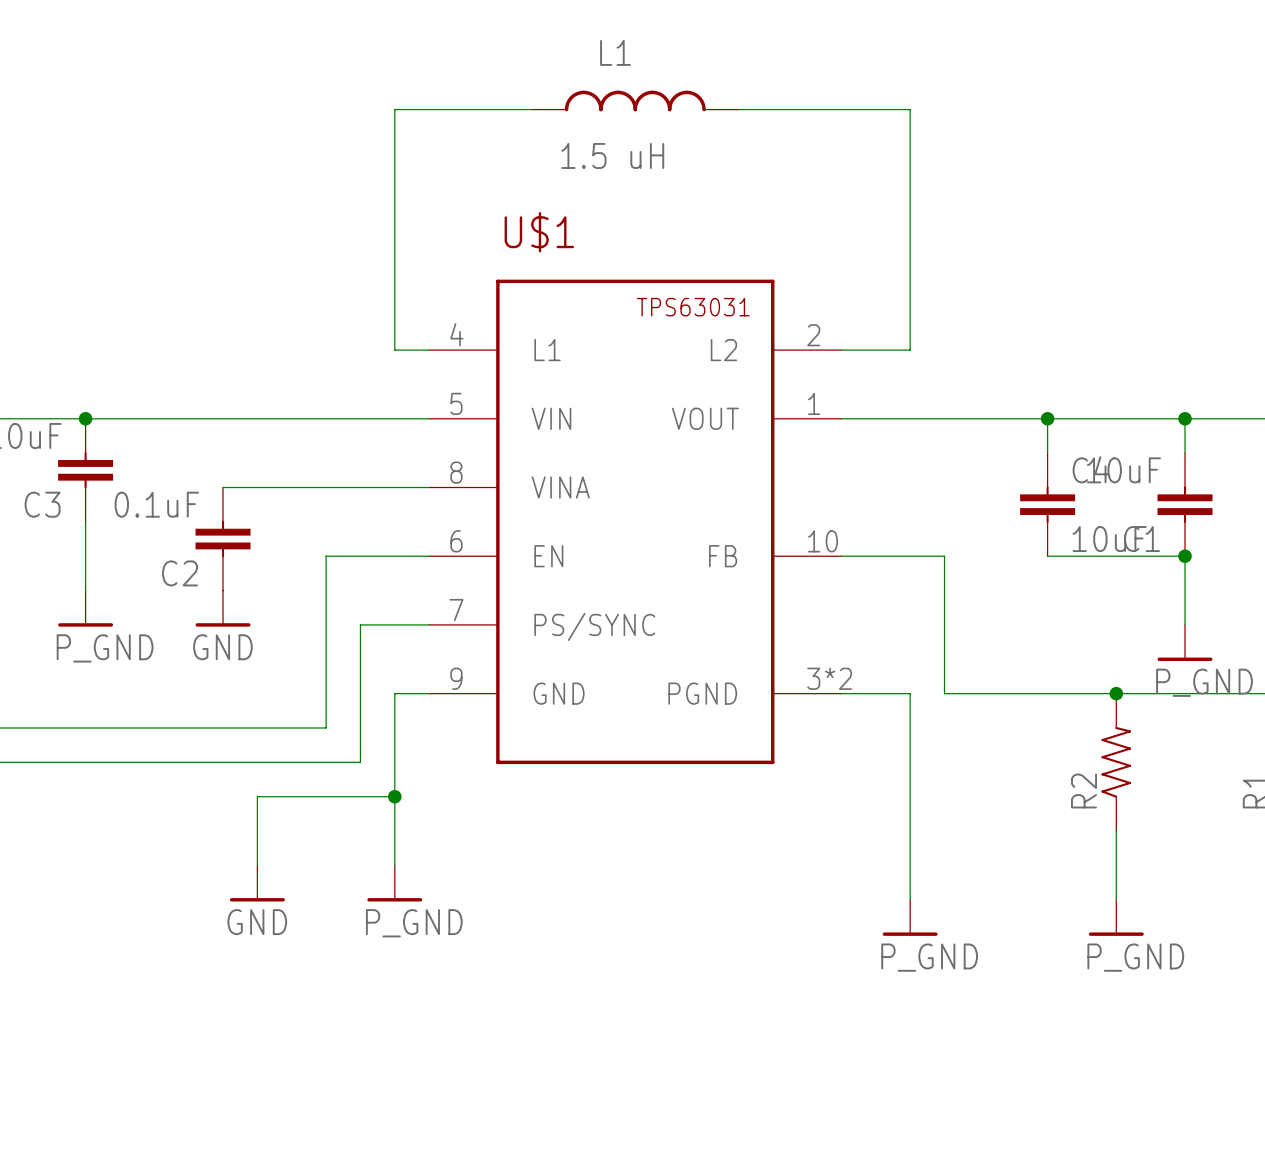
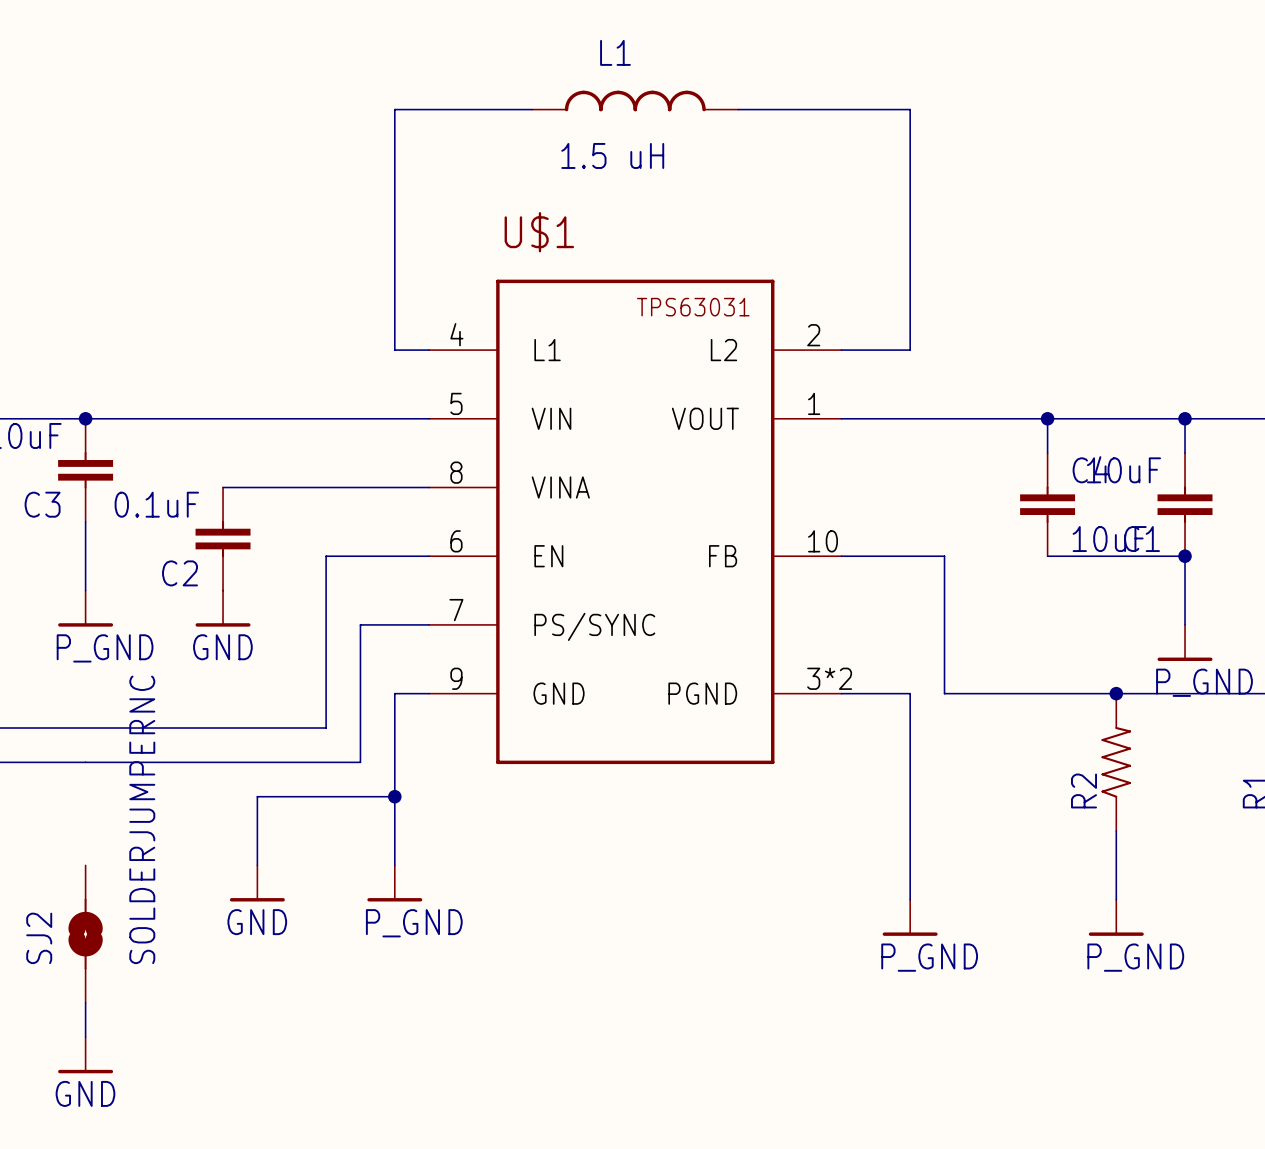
SJ2: none -> SOLDERJUMPERNC (85, 934)
wire: none -> (85, 1002) (85, 1037)
power symbol: none -> GND (85, 1055)

